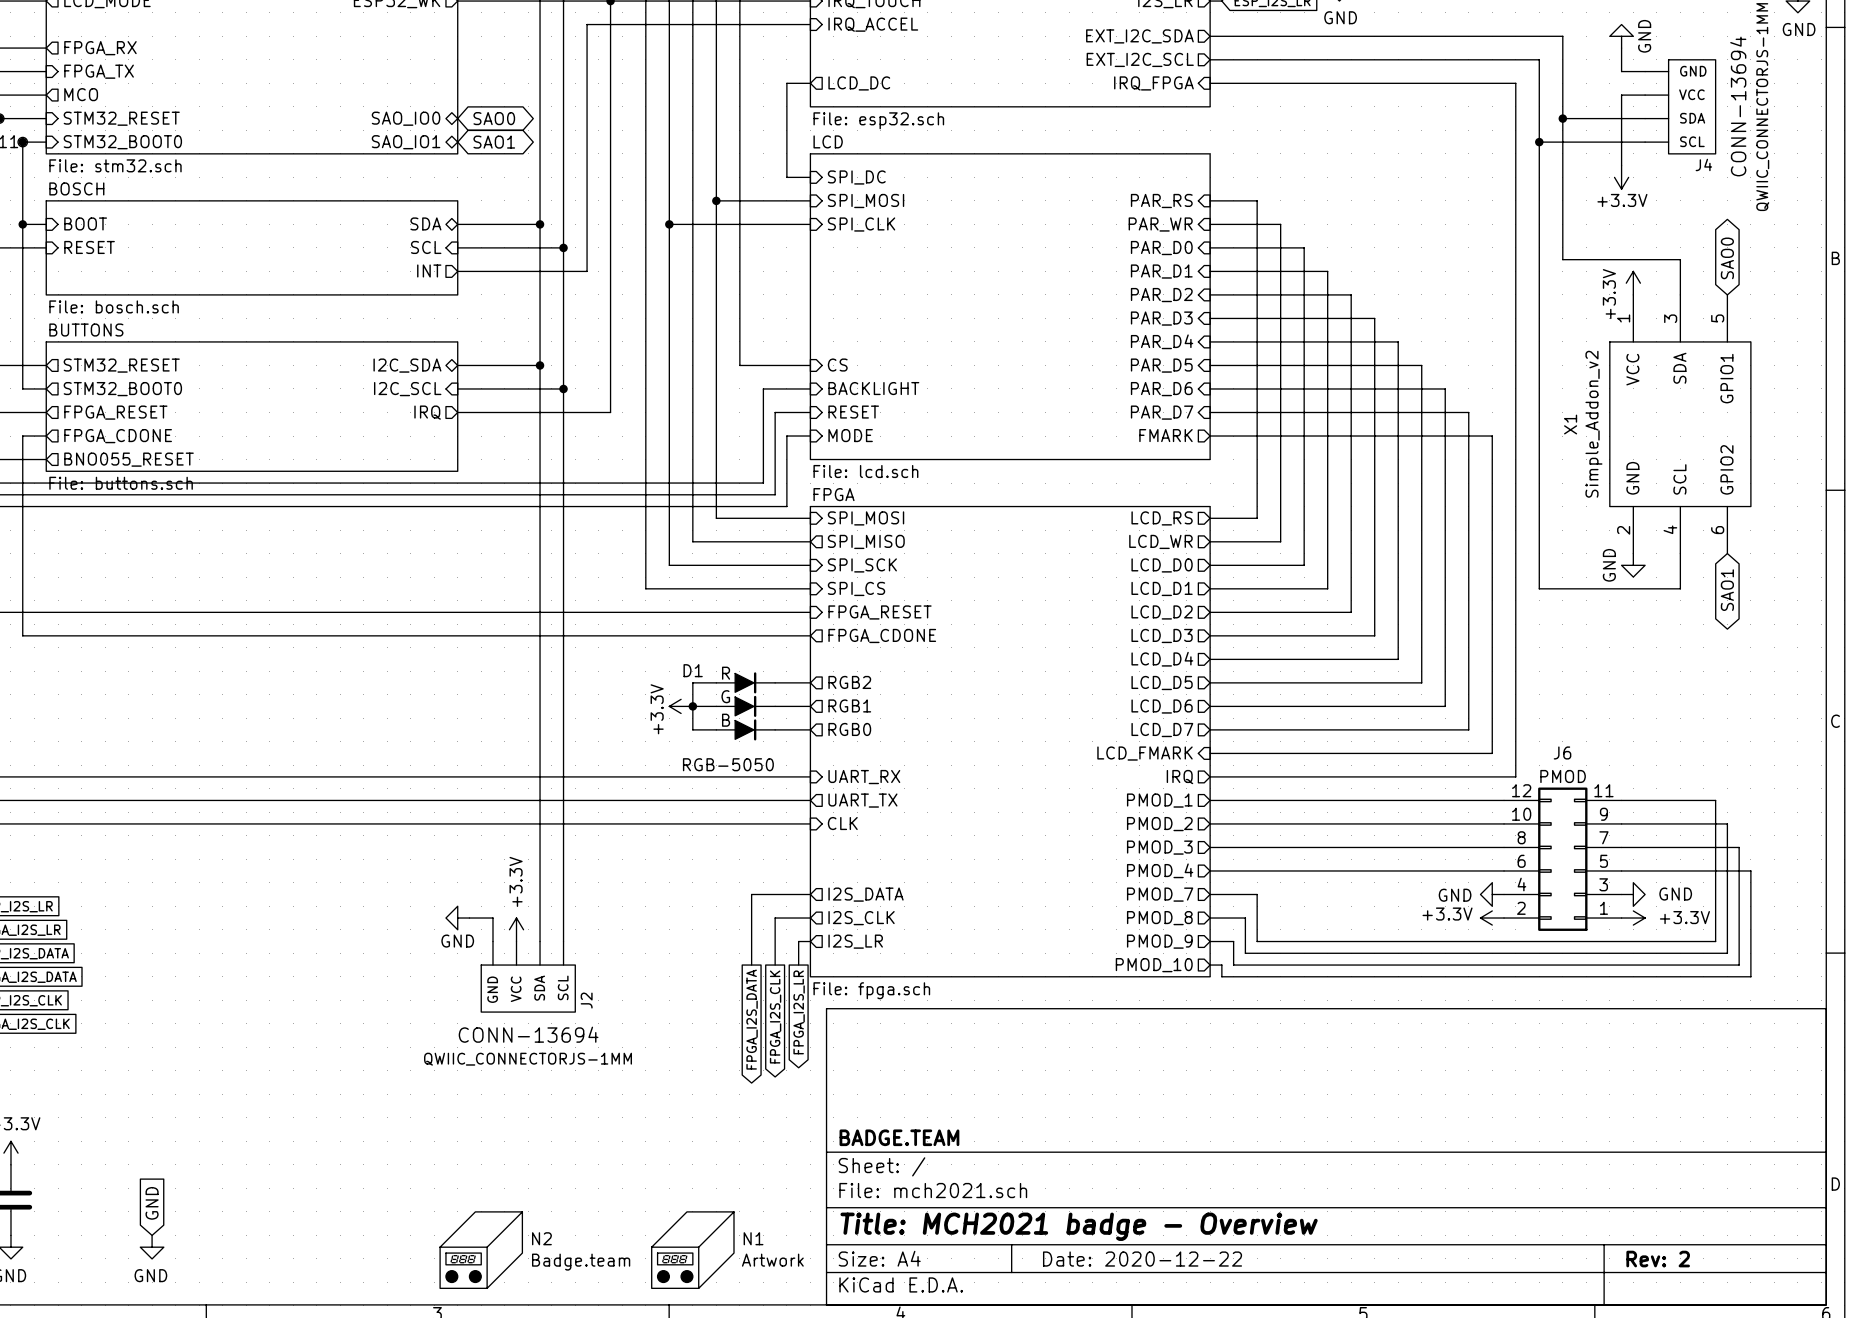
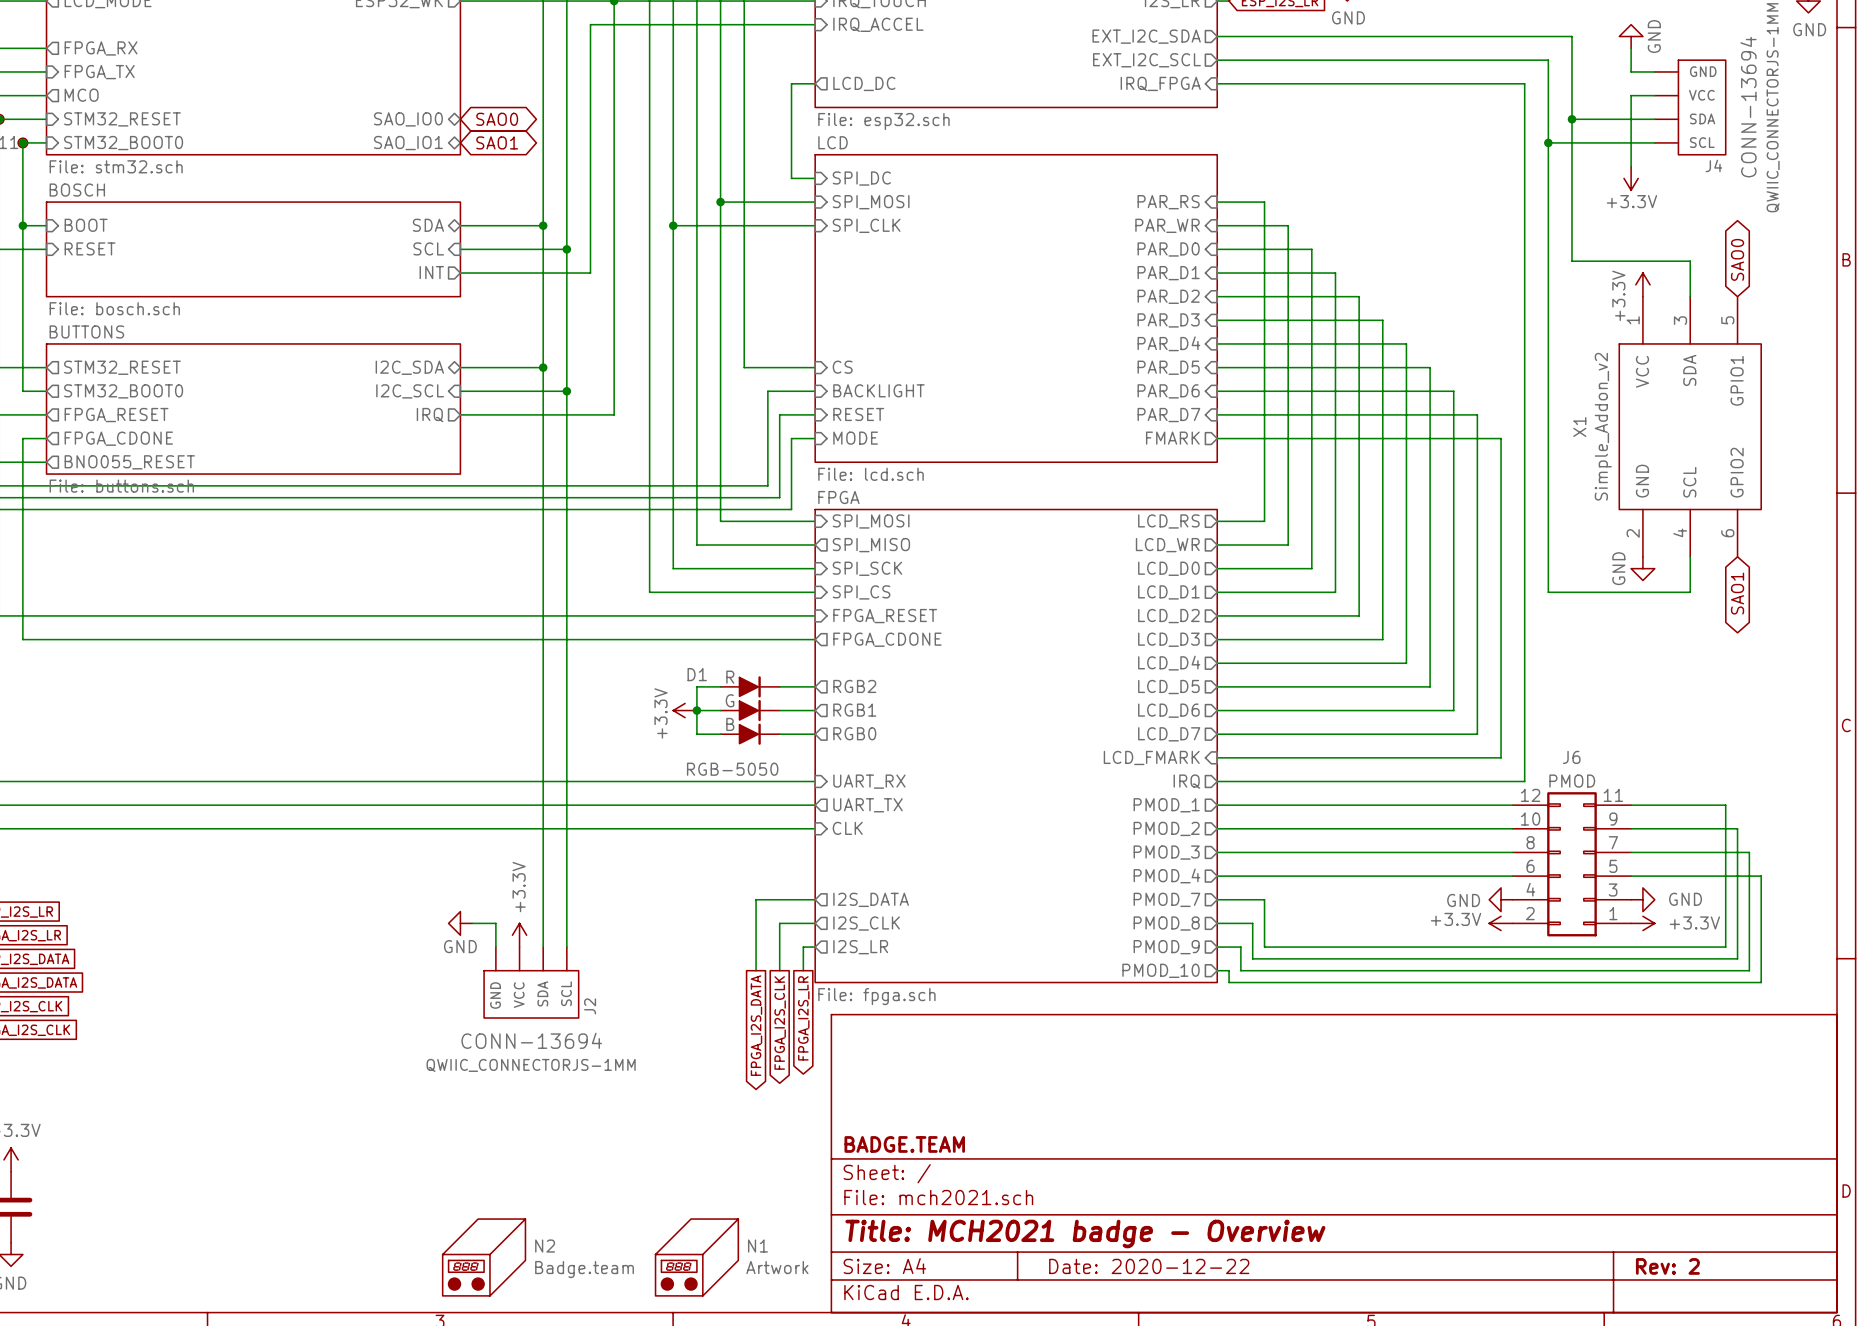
global label: GND (152, 1203) -> none
power symbol: GND (152, 1247) -> none

